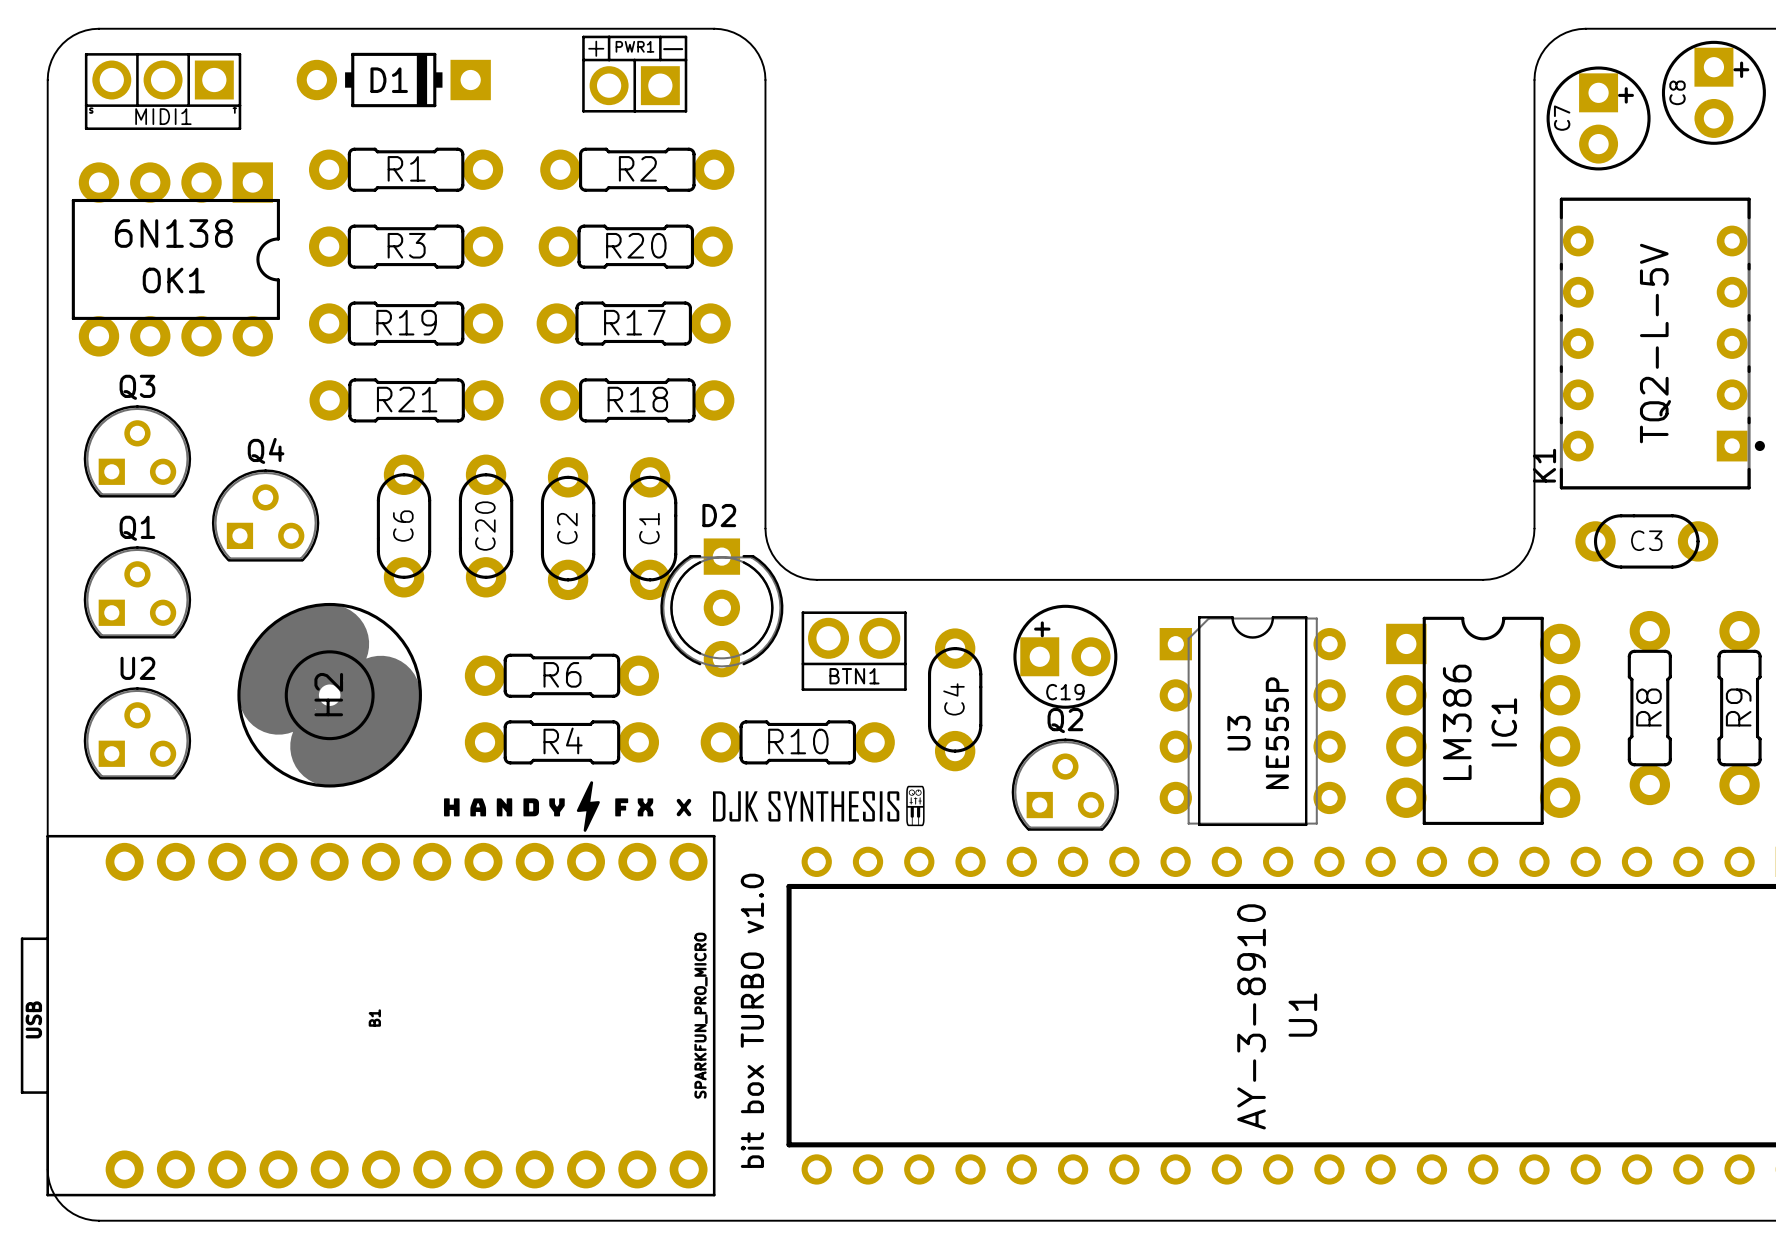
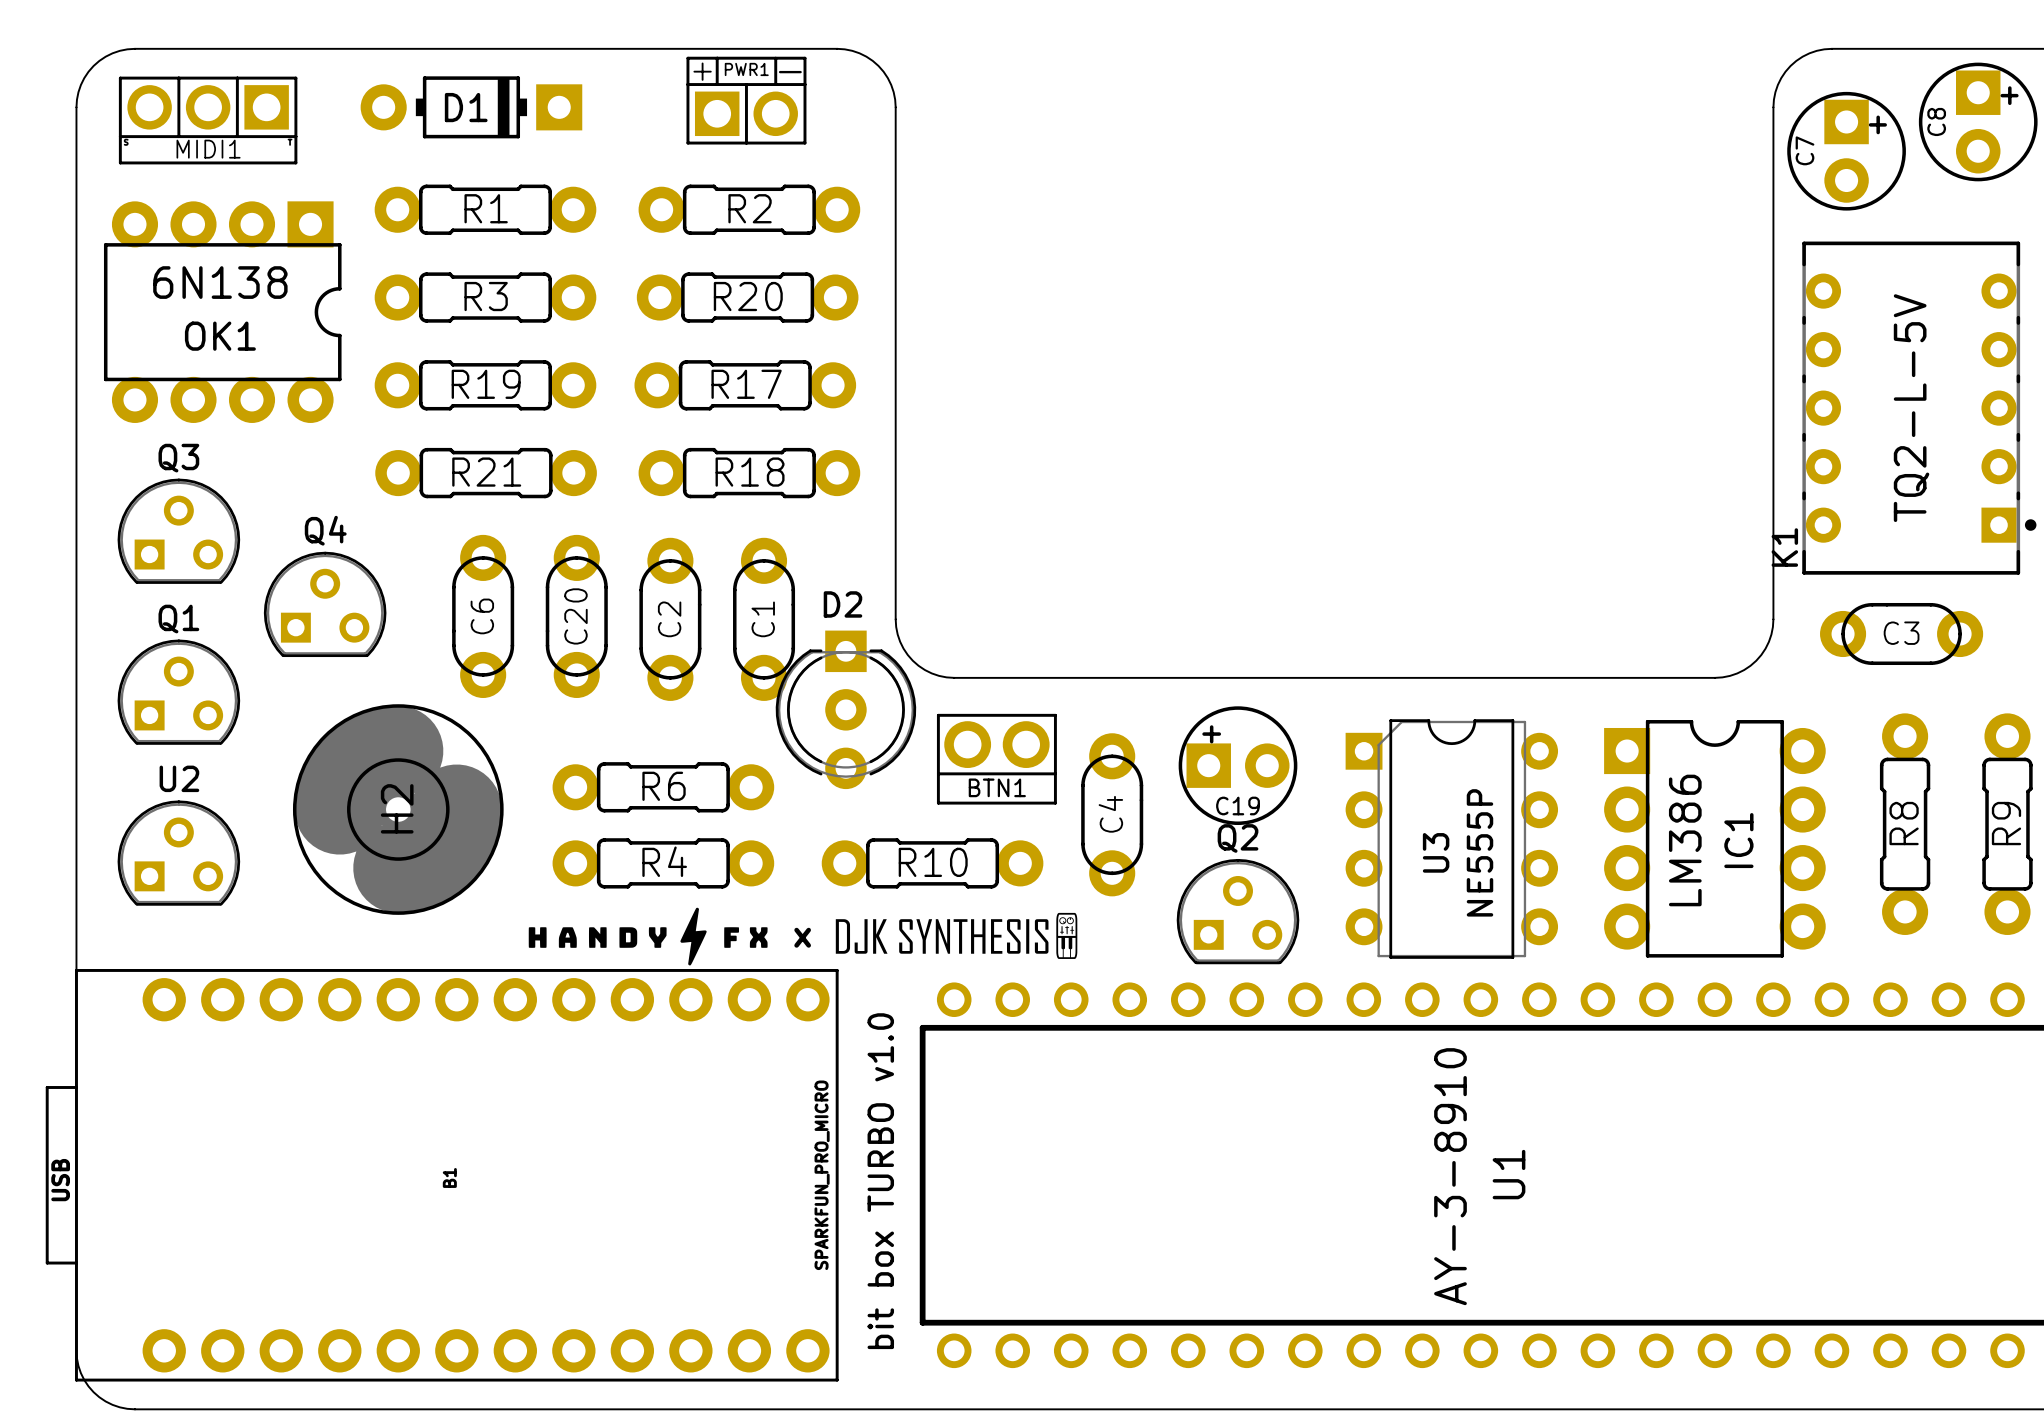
PWR1 footprint: [582, 35, 688, 113] -> [686, 56, 807, 145]

